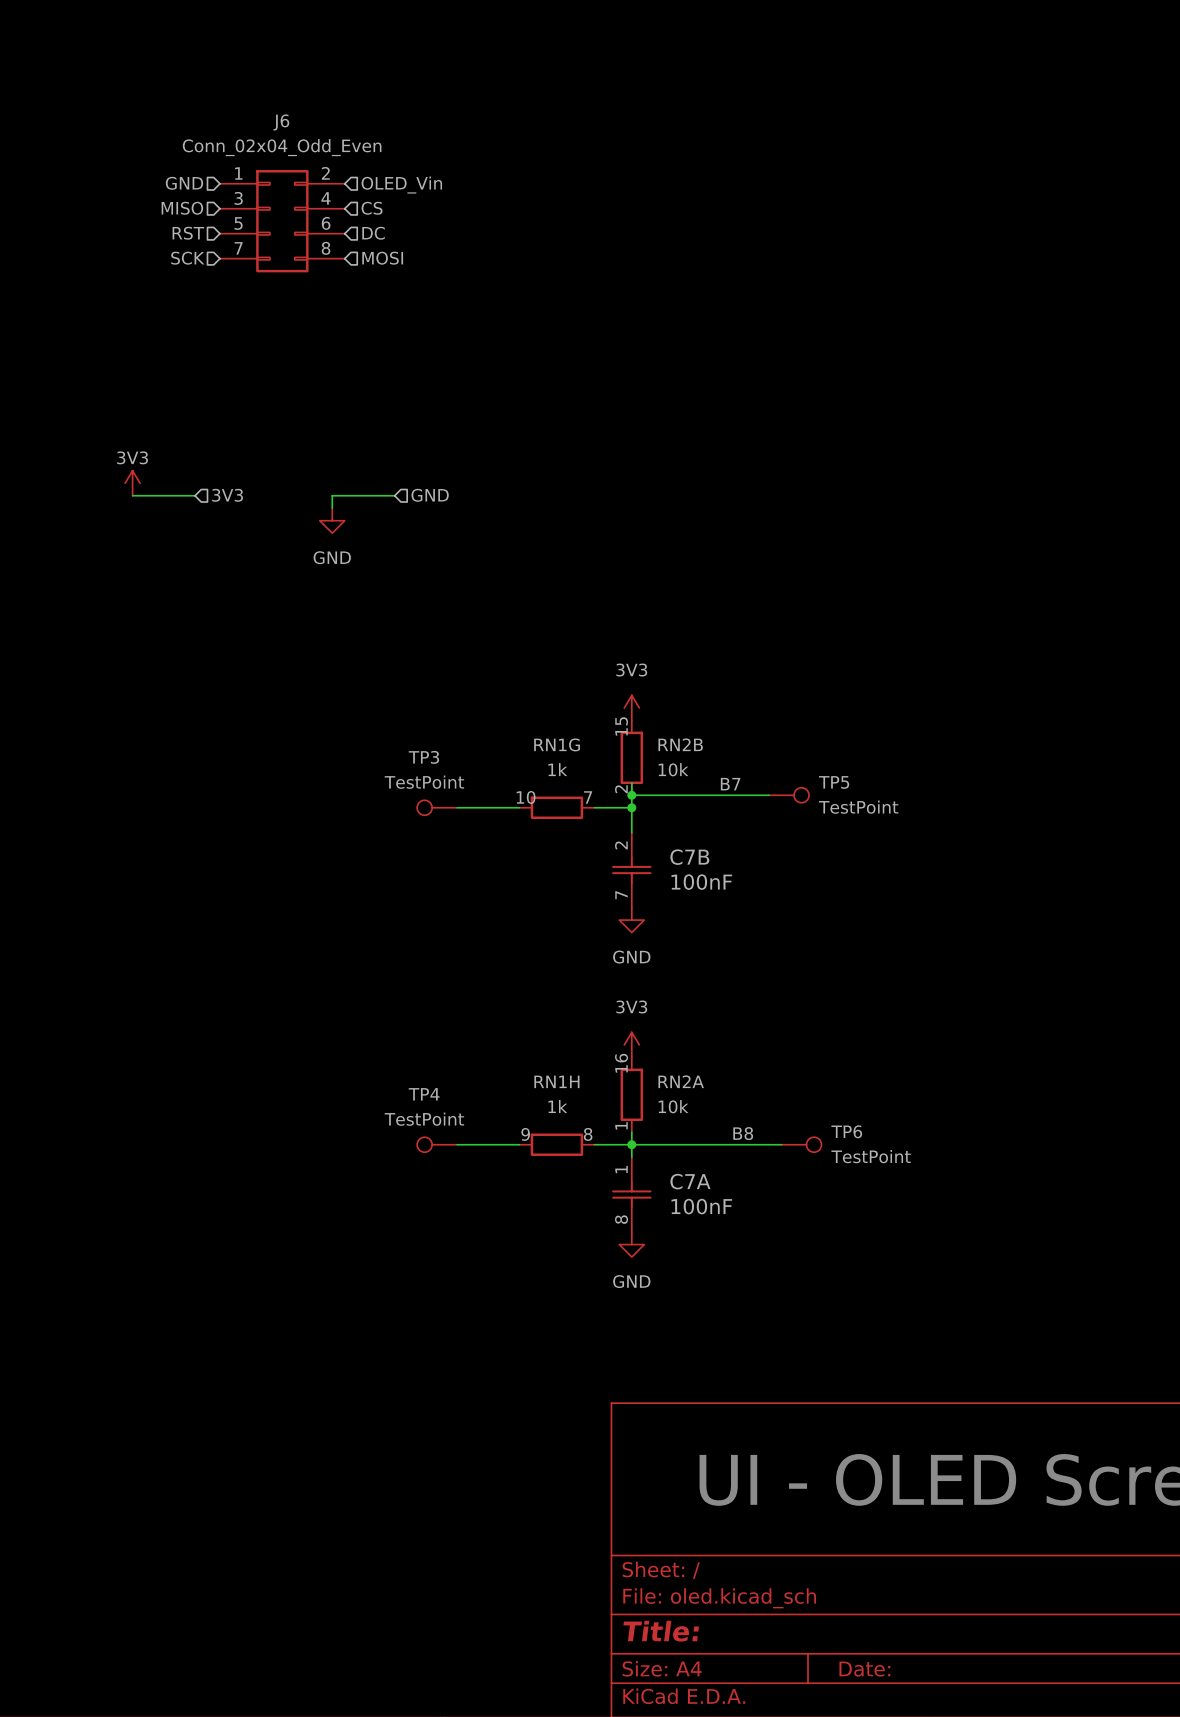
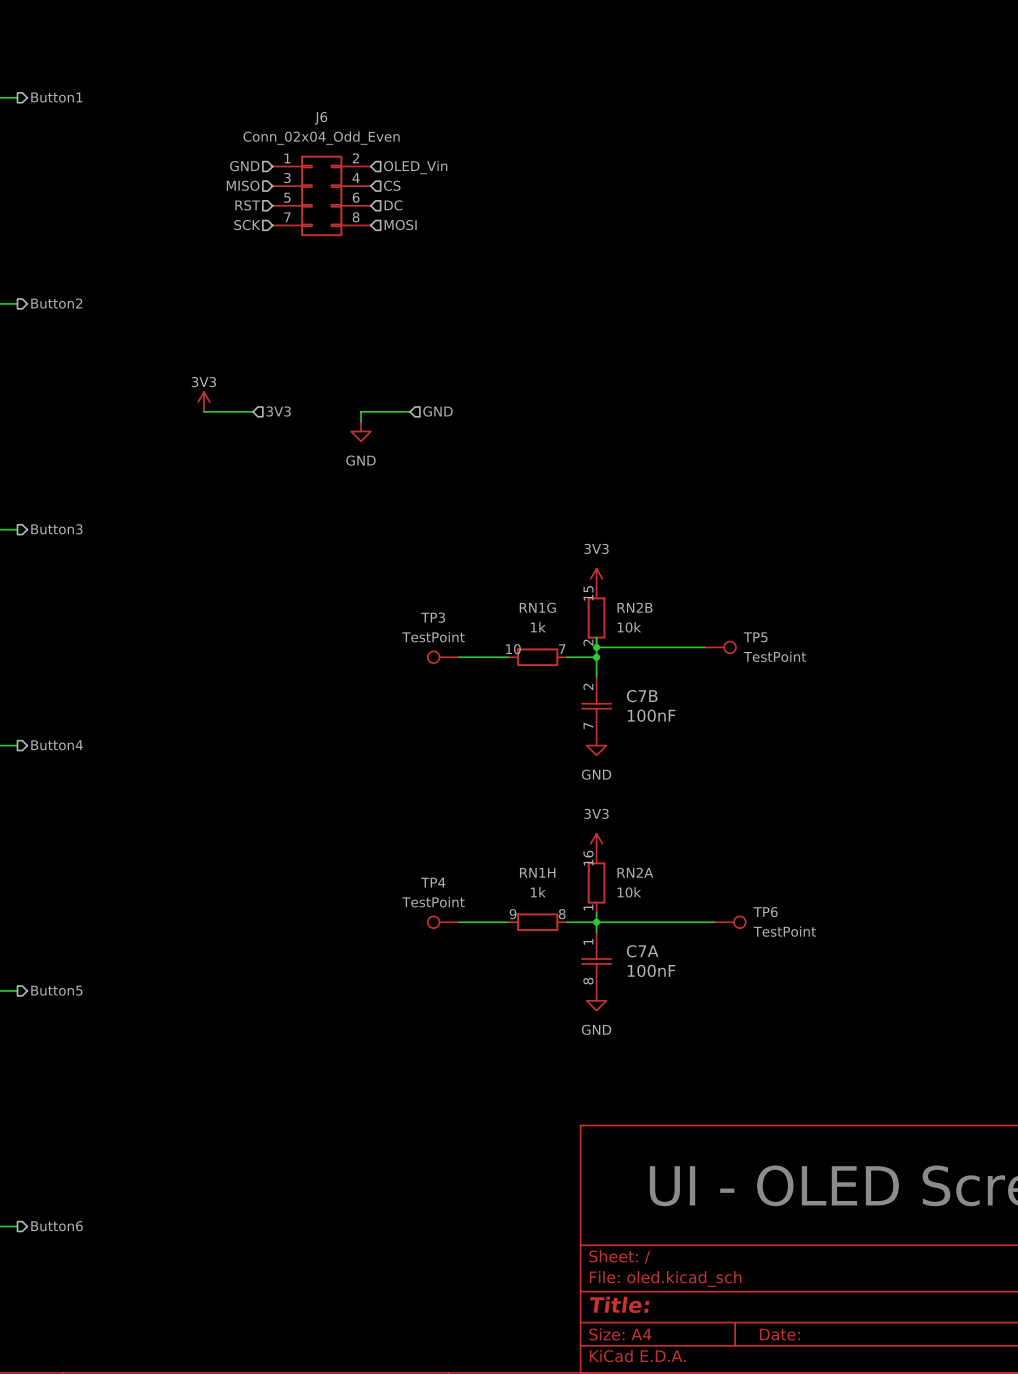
label: B7 (730, 784) -> none
label: B8 (743, 1133) -> none

